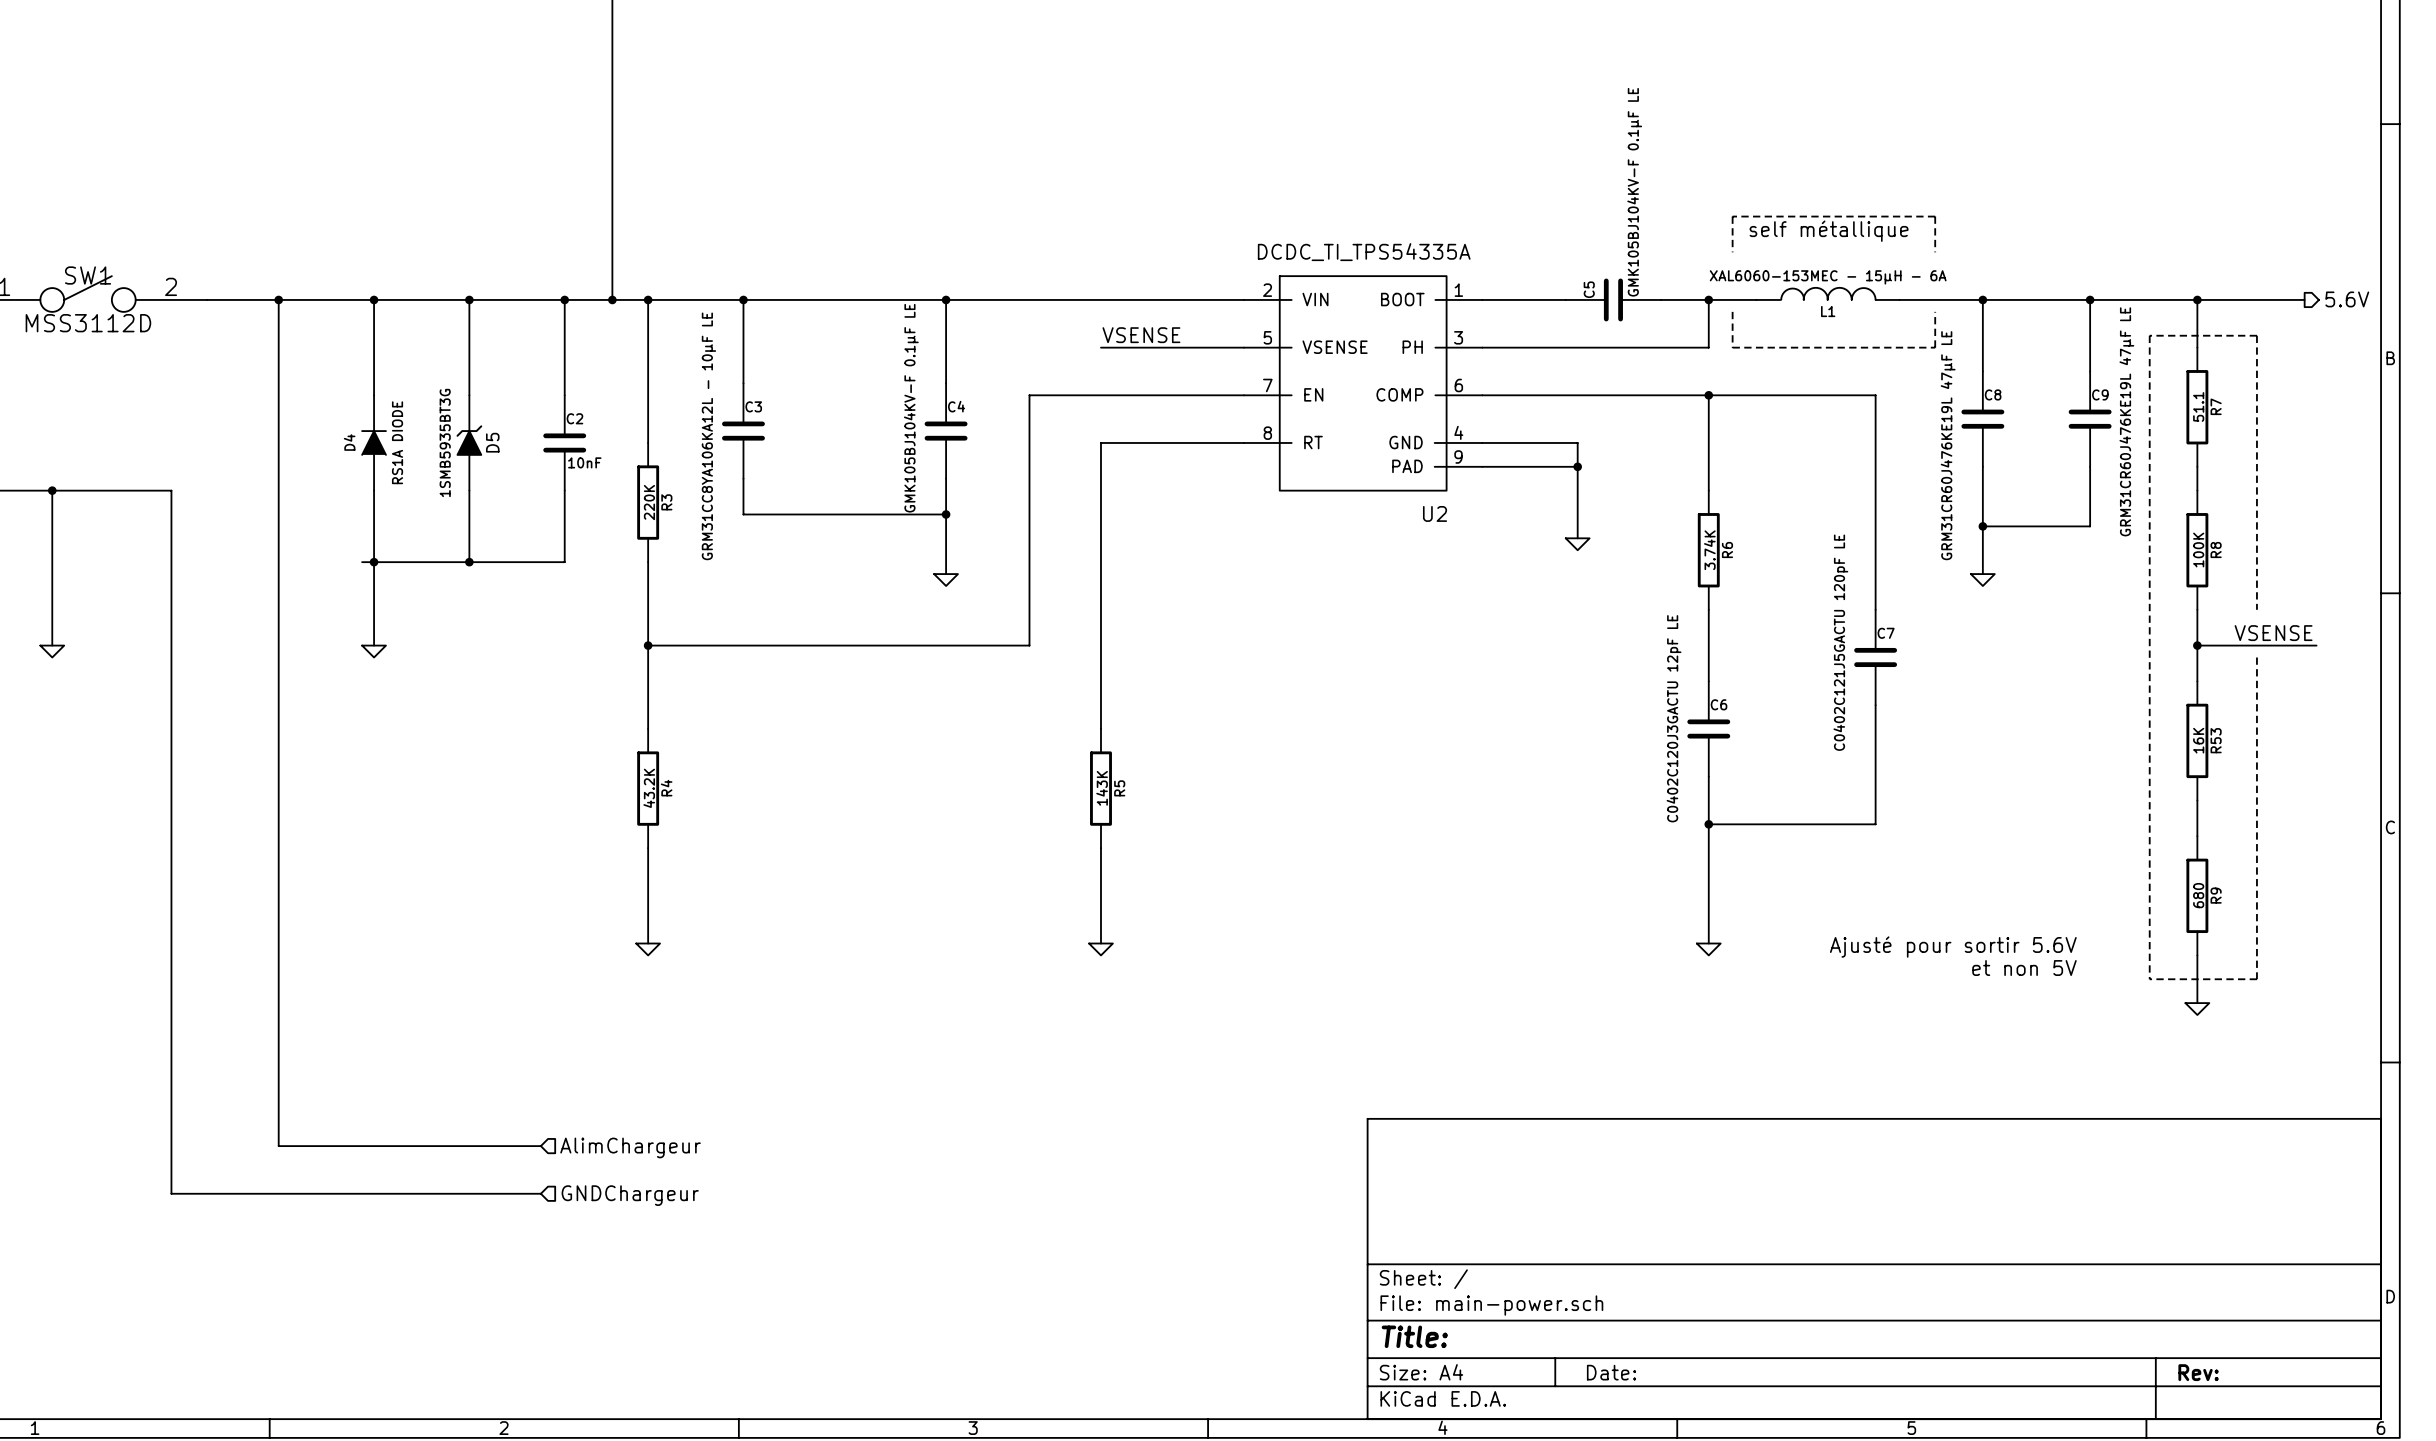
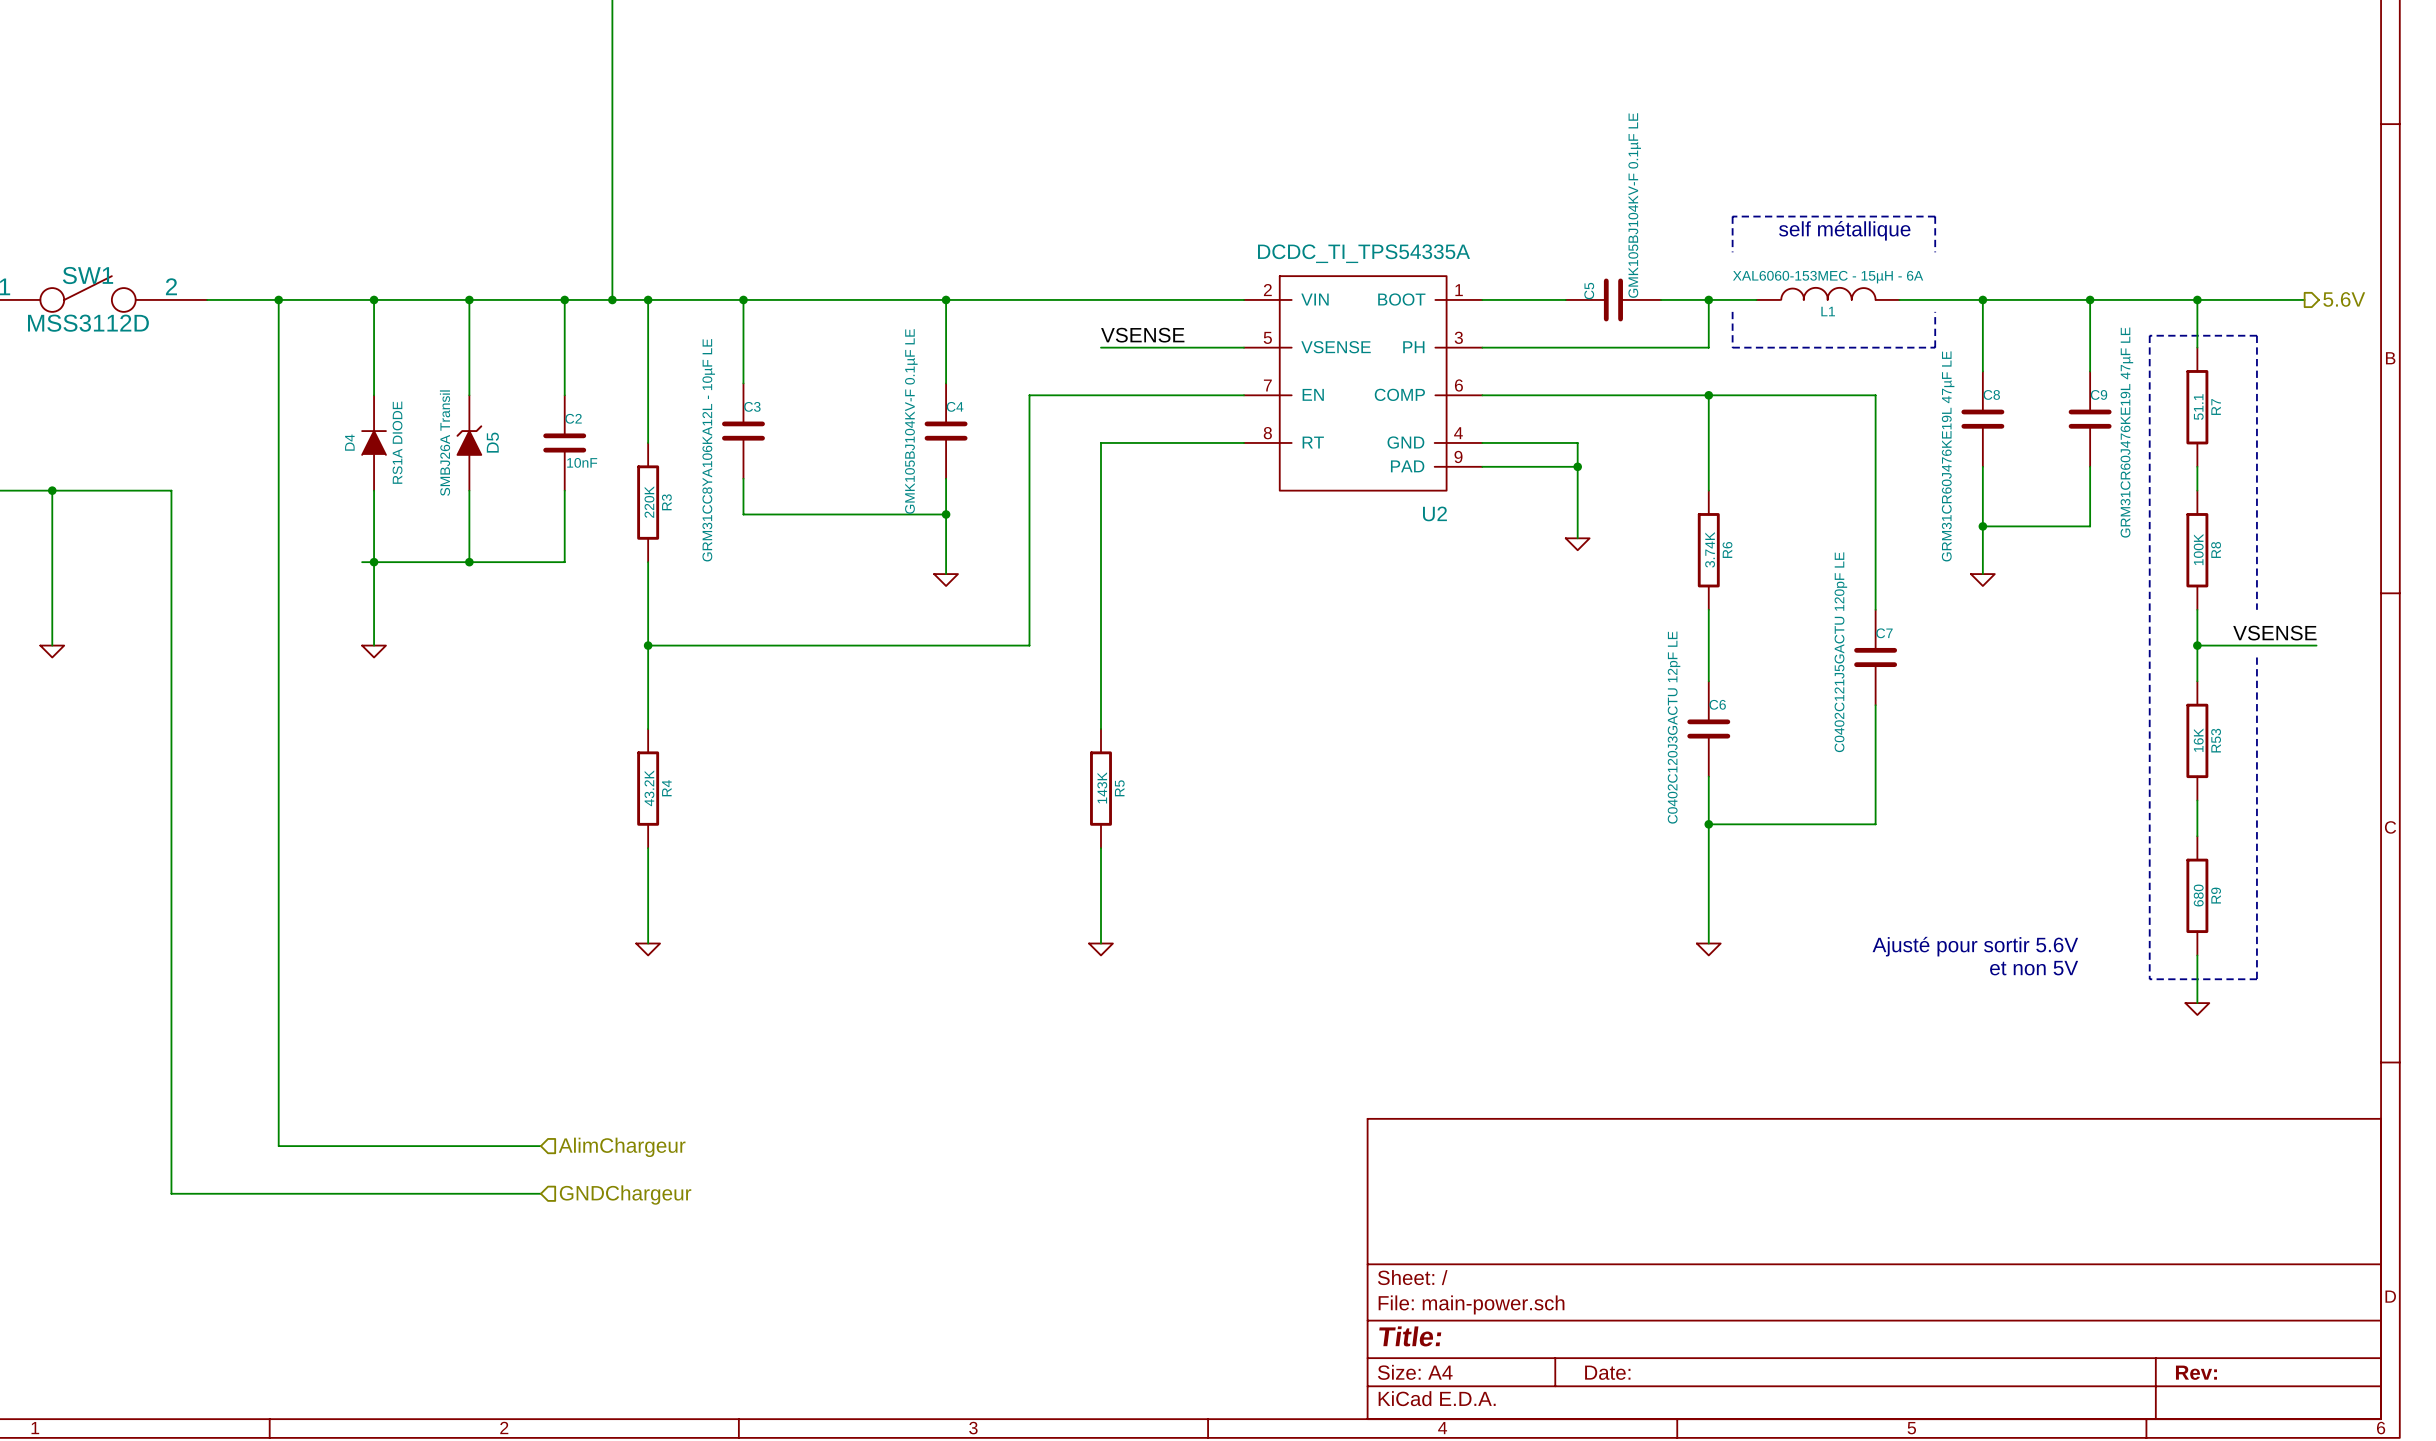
D5 value: 1SMB5935BT3G (445, 442) -> SMBJ26A Transil (445, 443)

